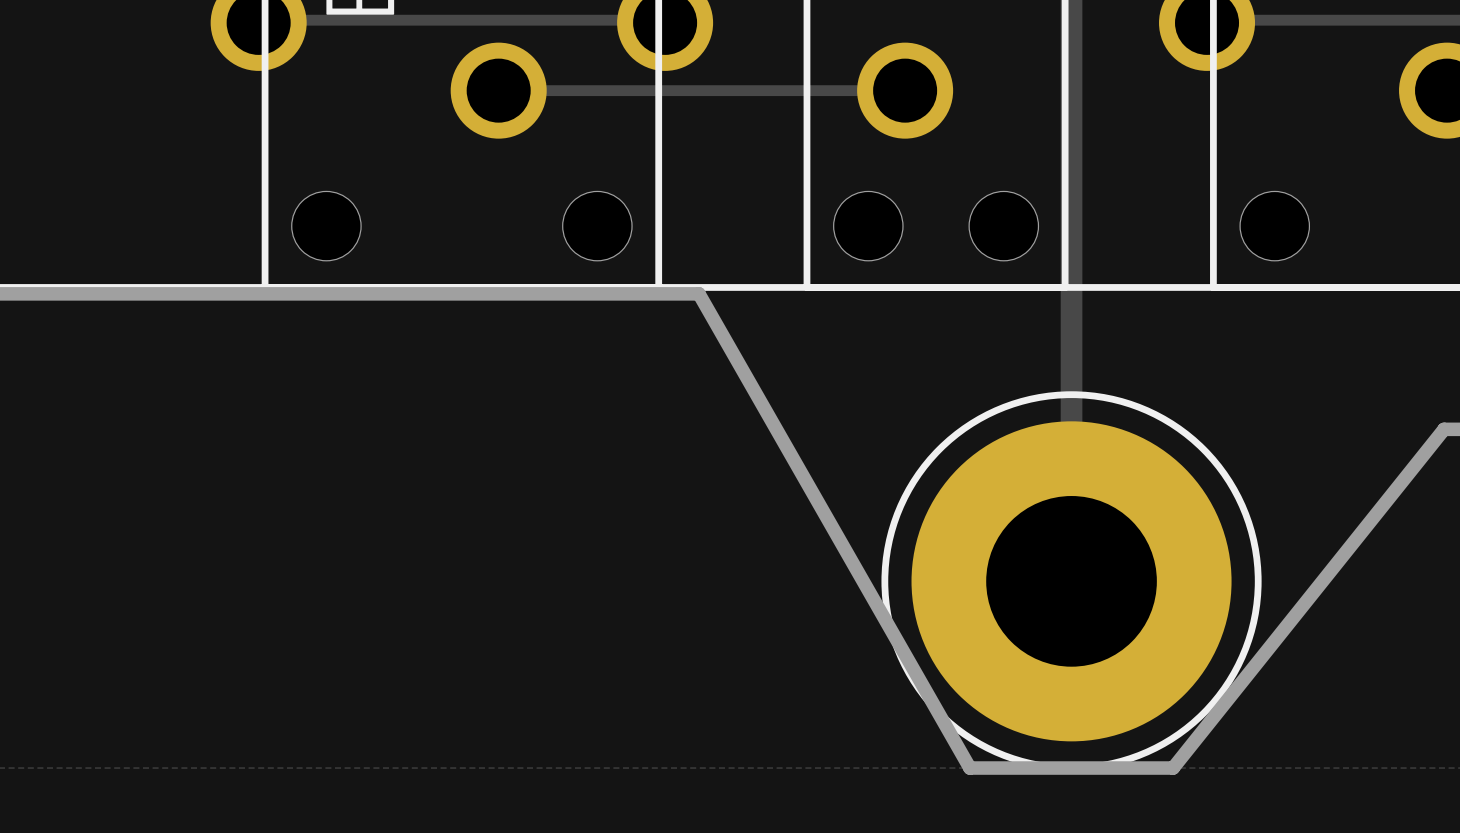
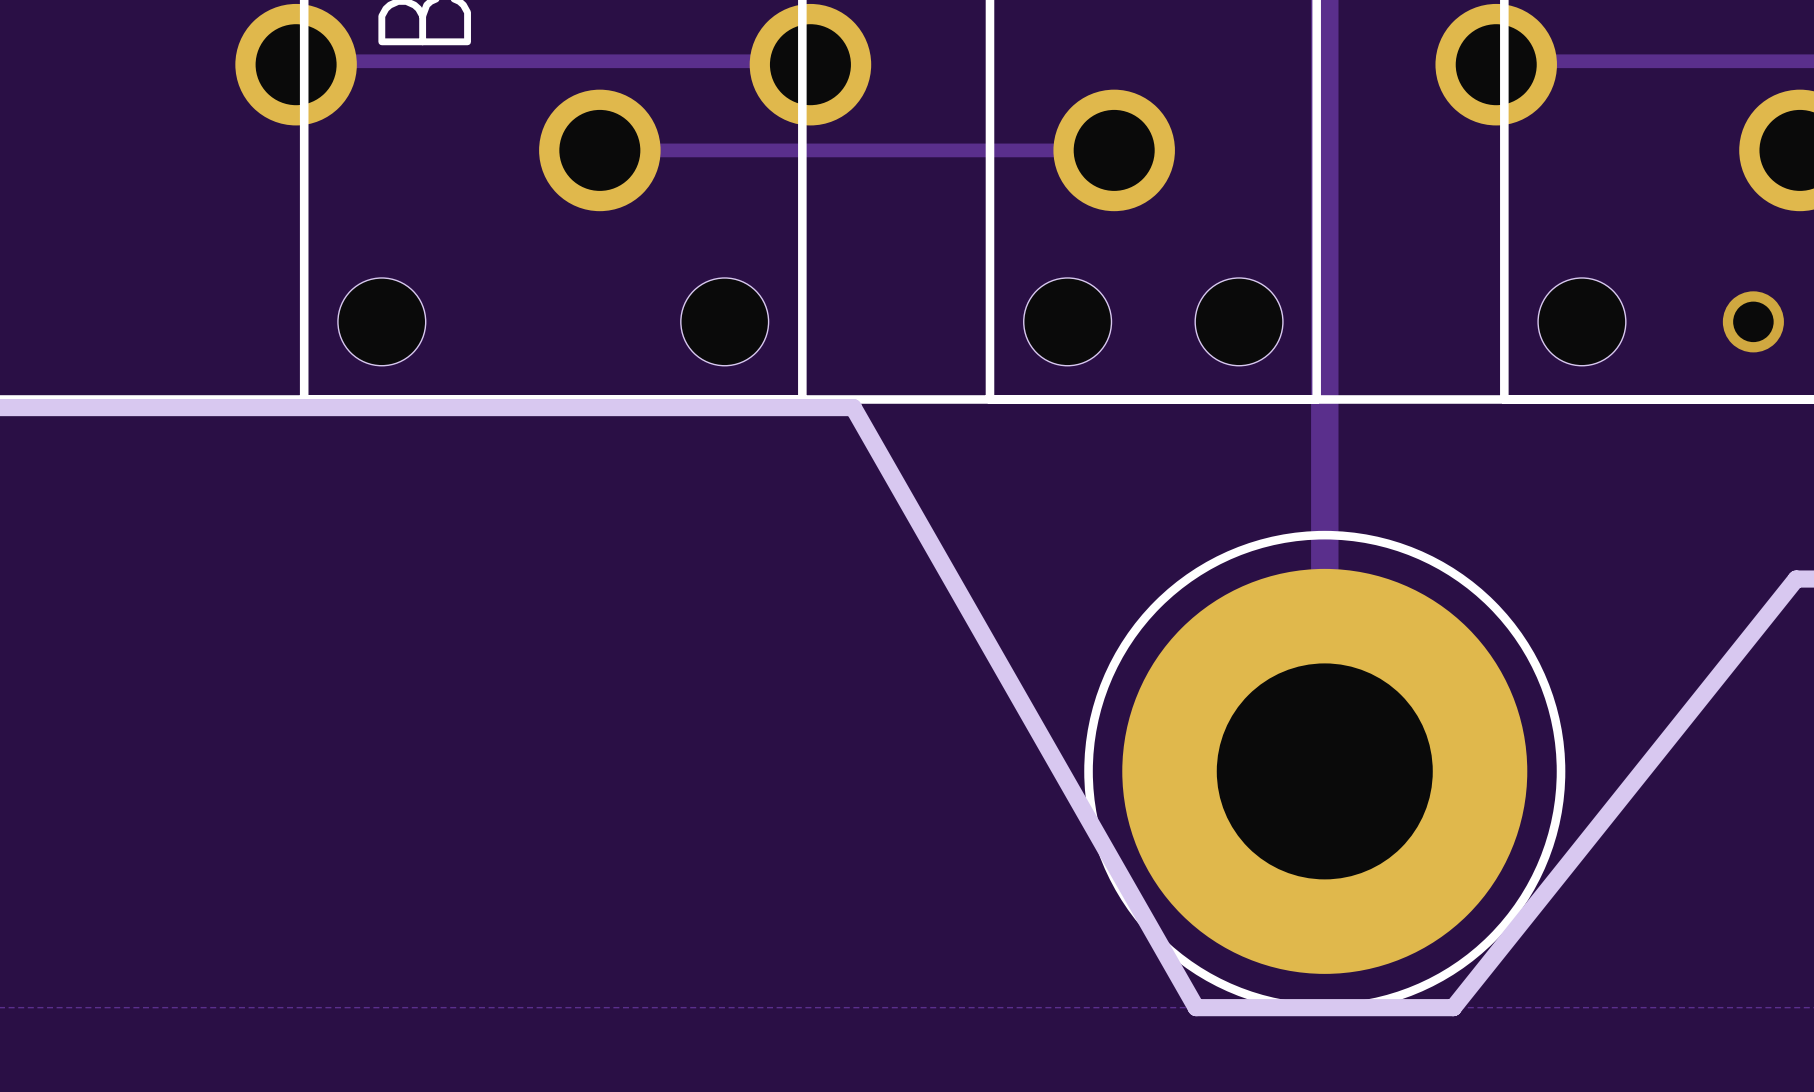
via: none -> (1753, 321)

